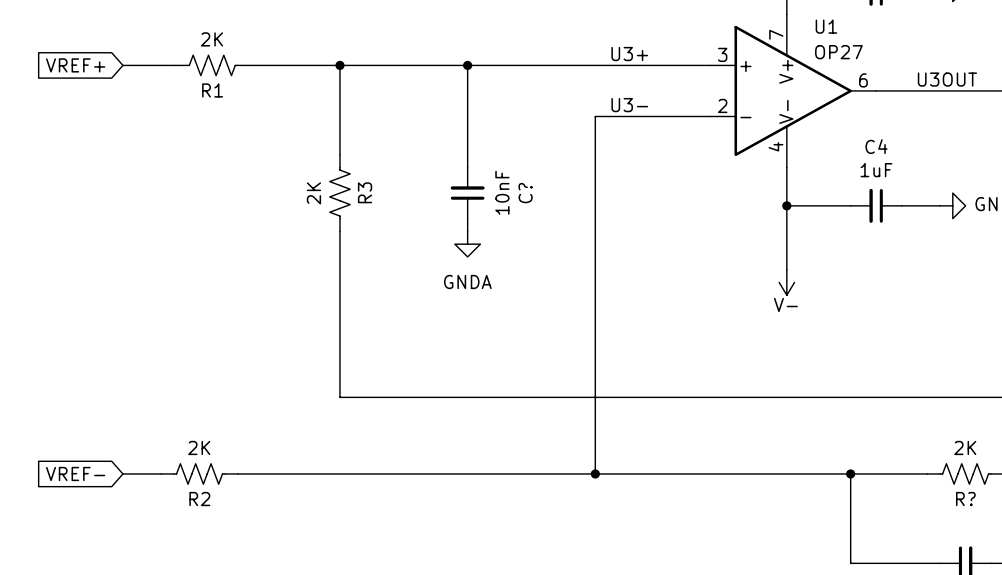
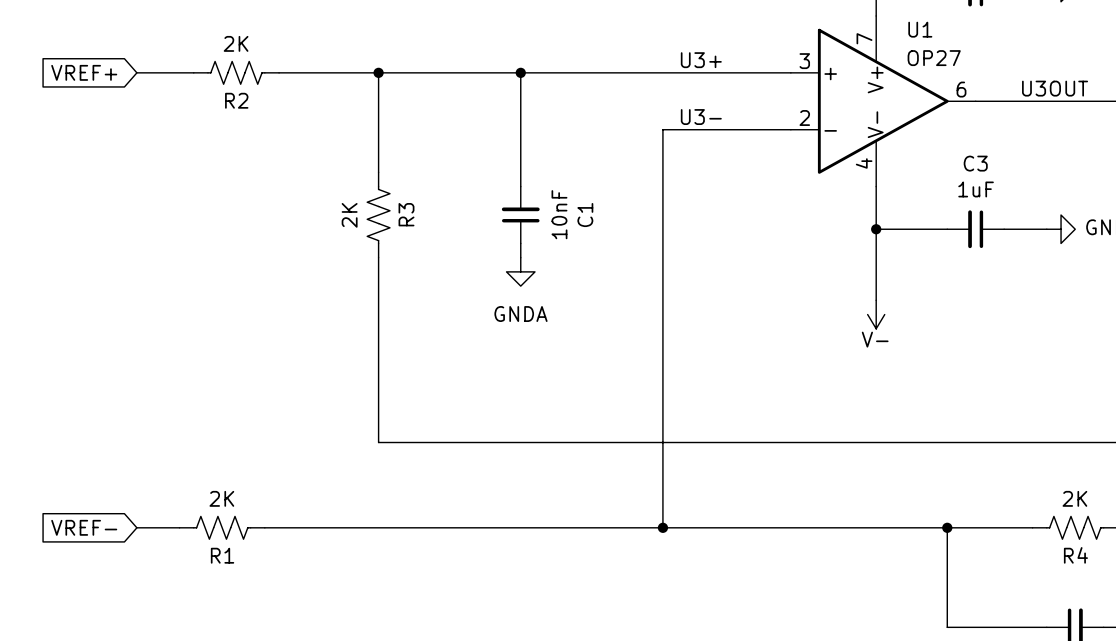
R1 name: R1 (212, 90) -> R2 (236, 100)
C4 name: C4 (876, 146) -> C3 (975, 163)
C? name: C? (525, 193) -> C1 (585, 215)
R2 name: R2 (199, 499) -> R1 (222, 555)
R? name: R? (965, 499) -> R4 (1075, 555)

